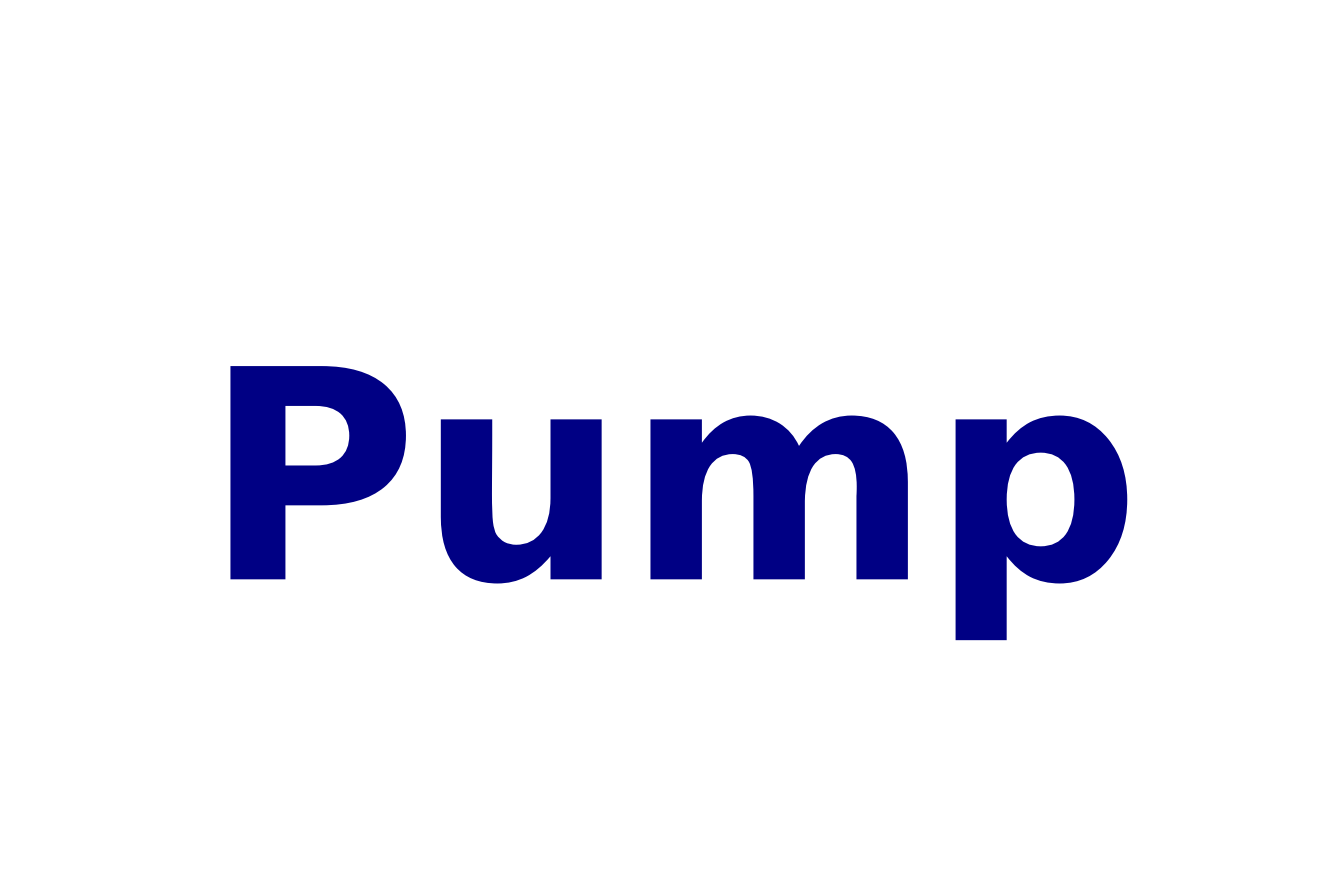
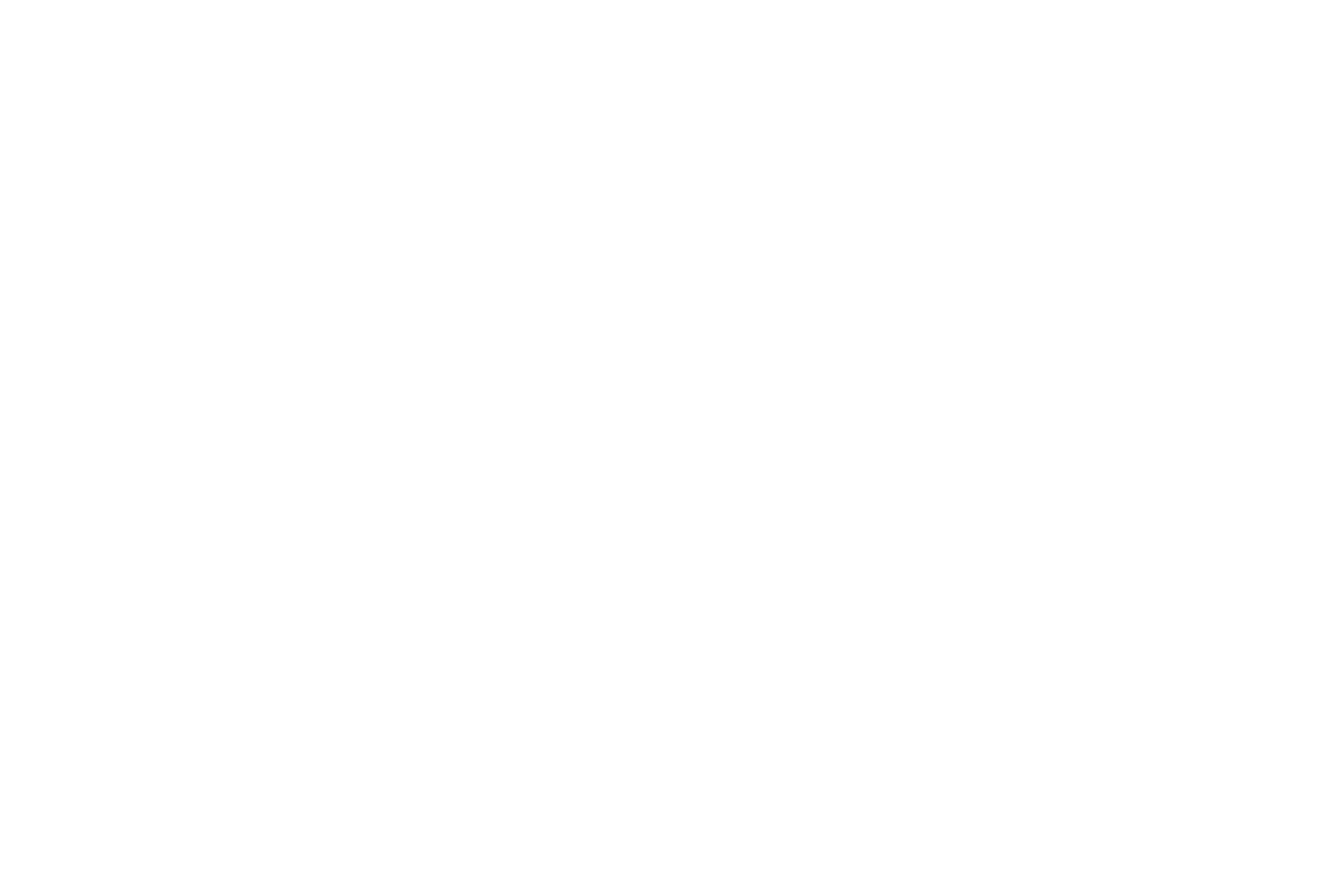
text: Pump (678, 503) -> none

